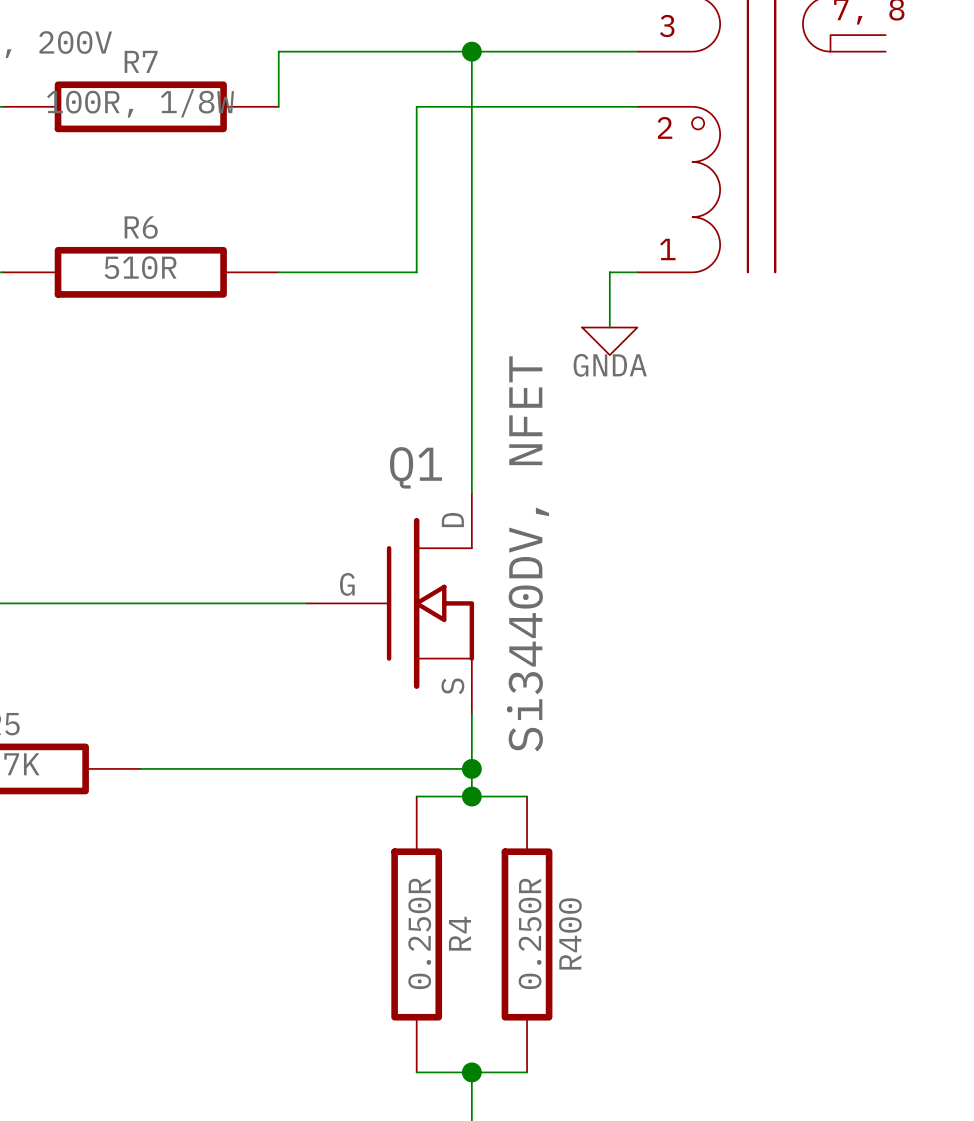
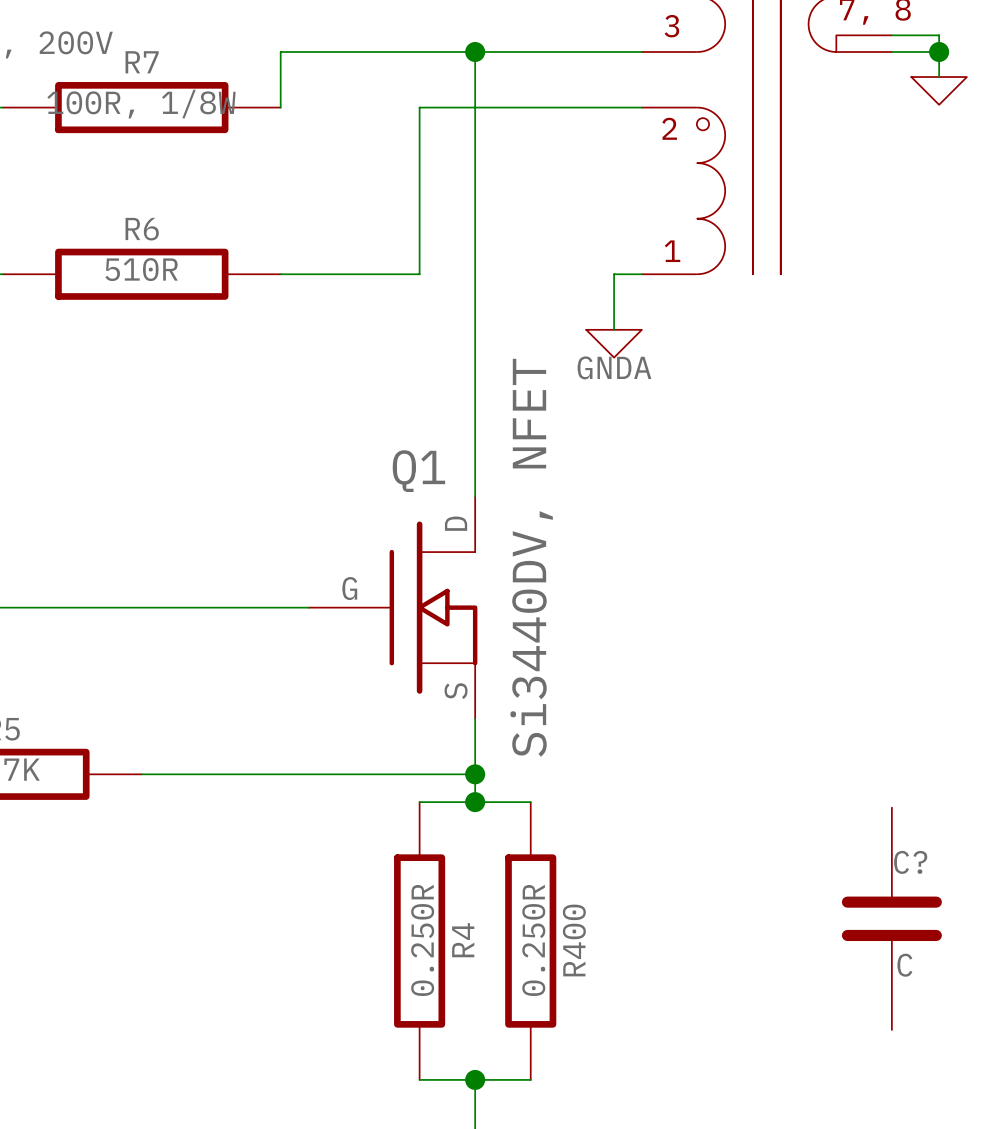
wire: none -> (891, 35) (939, 35) (939, 77)
wire: none -> (891, 52) (939, 52)
junction: none -> (939, 52)
power symbol: none -> (939, 90)
C?: none -> C (891, 918)

